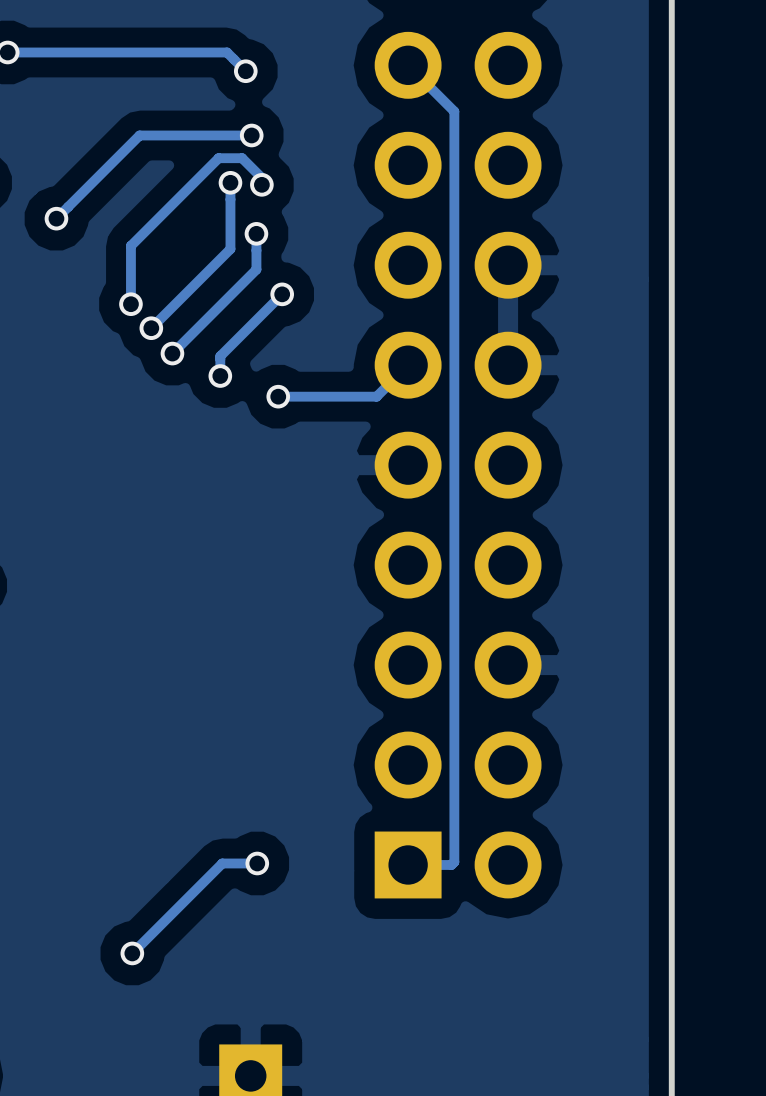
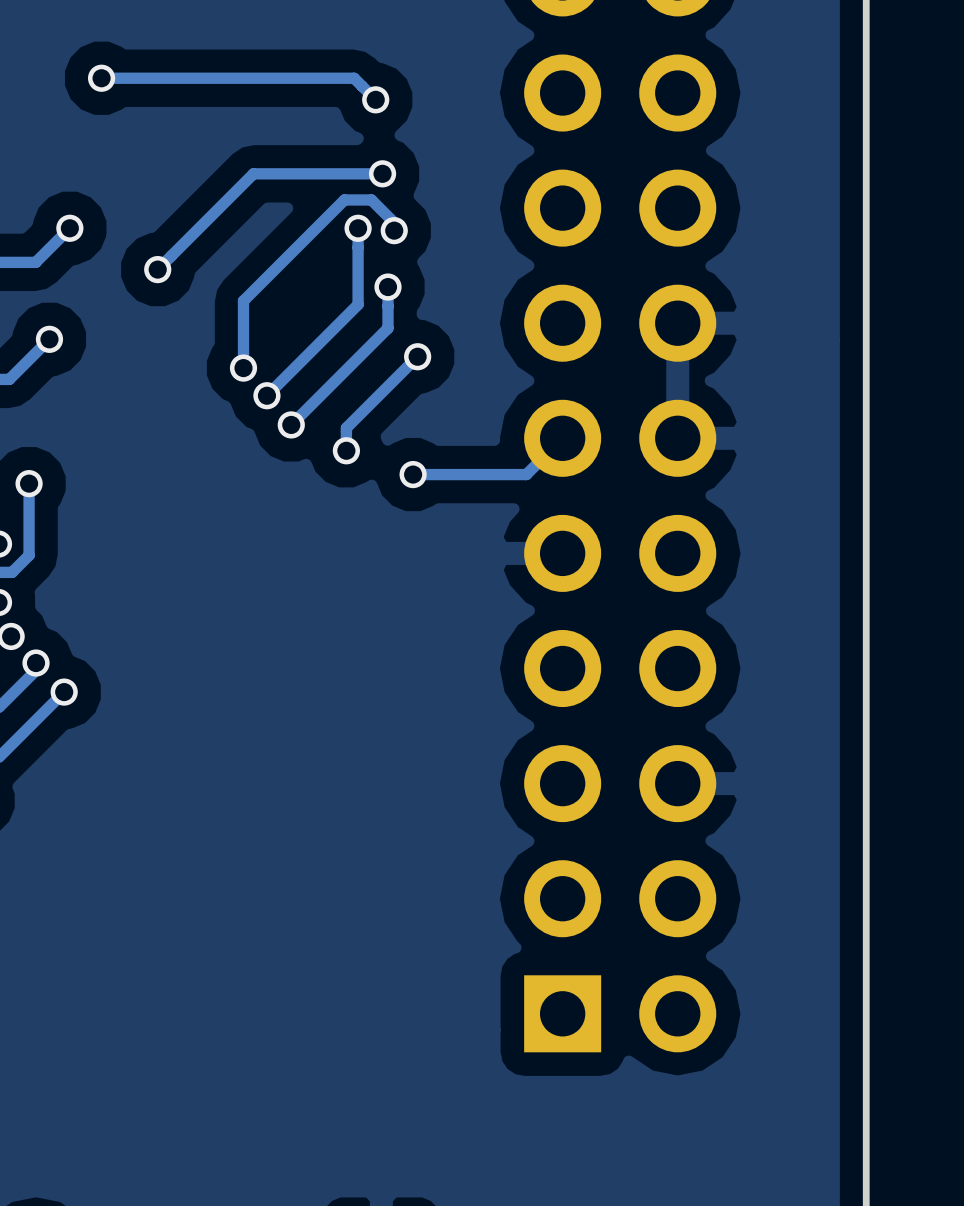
track: (408, 65) (454, 111) (454, 862) (451, 864) (408, 864) -> none
track: (257, 863) (222, 863) (132, 953) -> none
via: (257, 863) -> none
via: (132, 953) -> none

